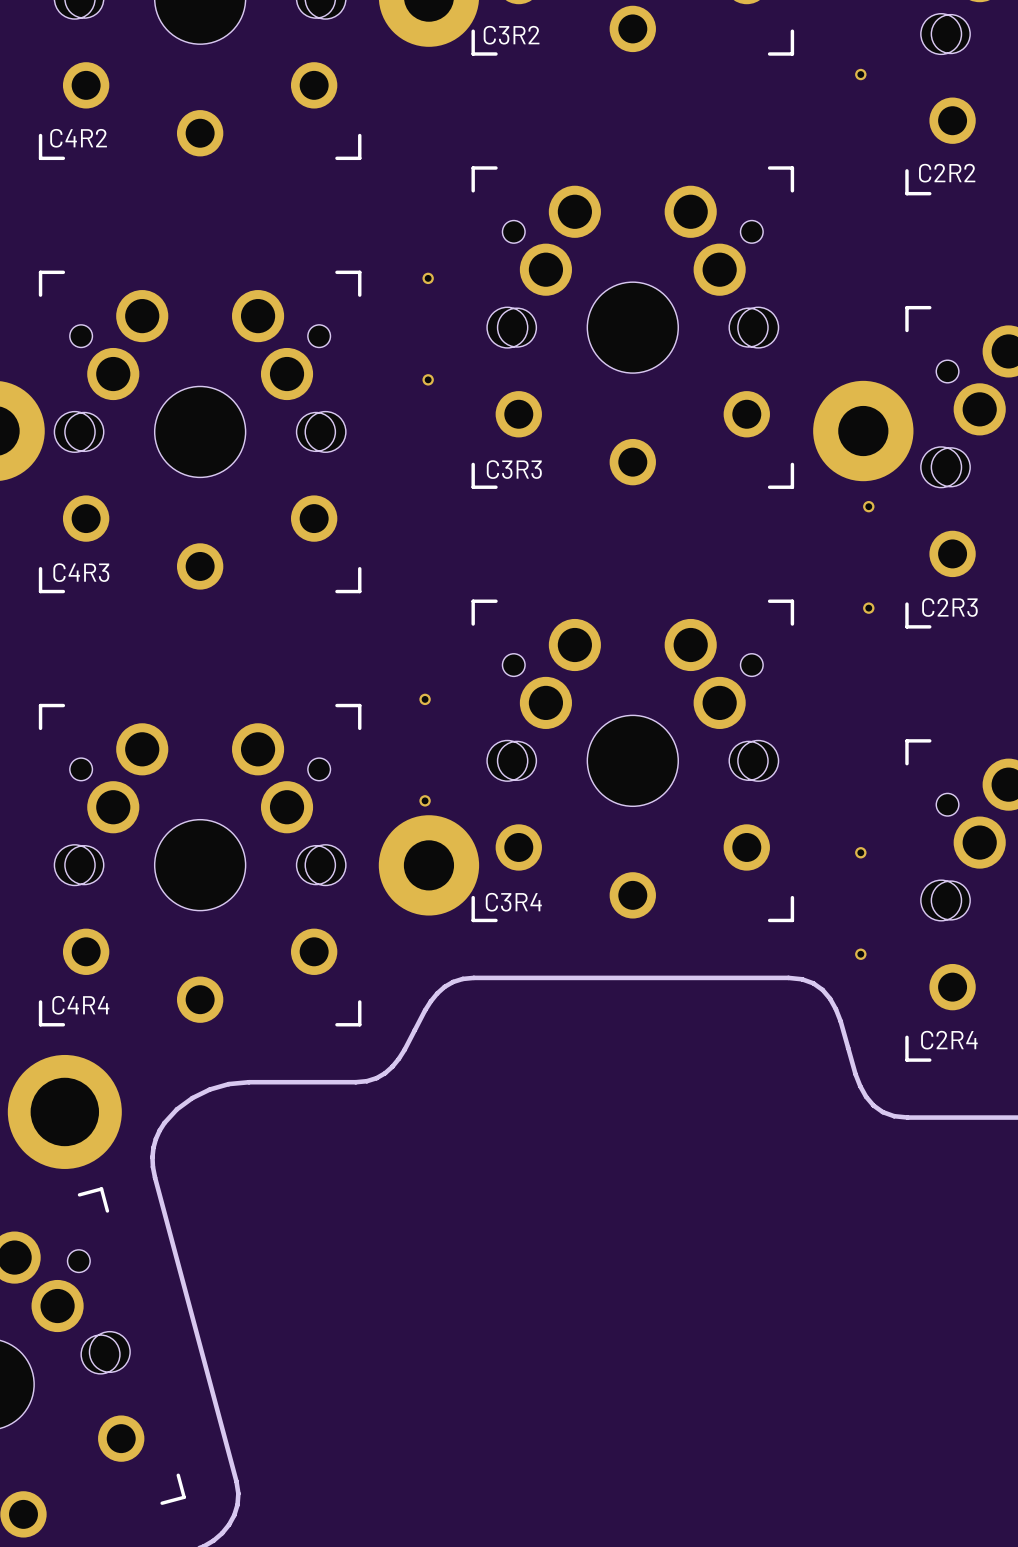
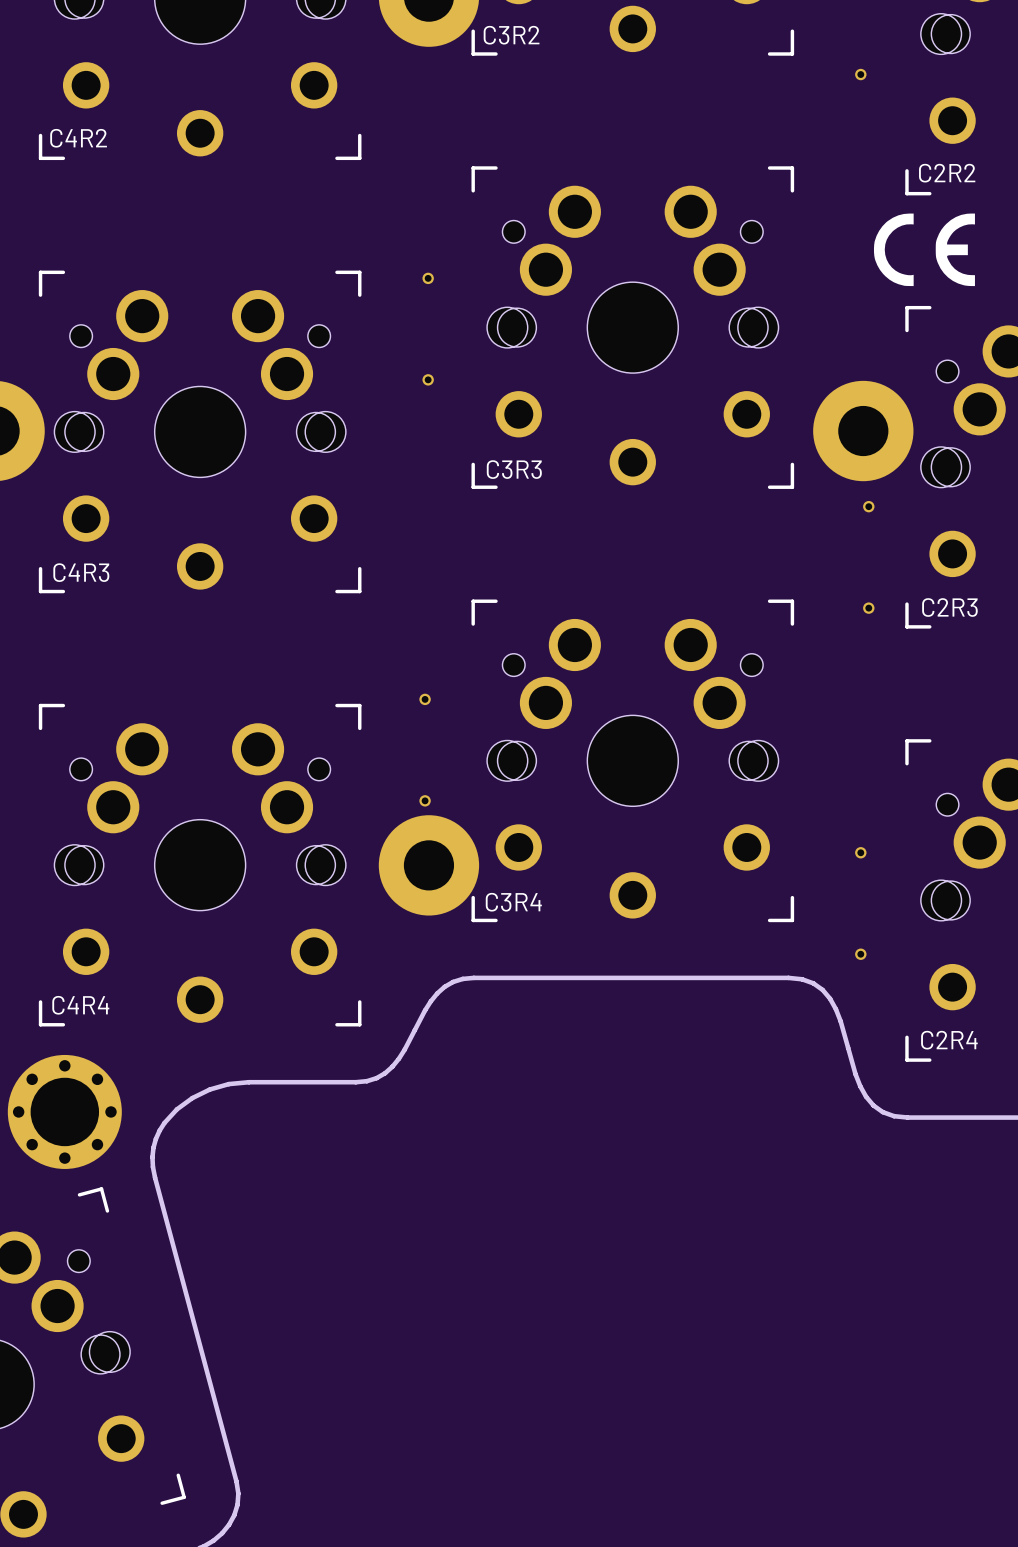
drawing: none -> [873, 213, 975, 287]
part footprint: [7, 1054, 122, 1169] -> [7, 1054, 122, 1169]

